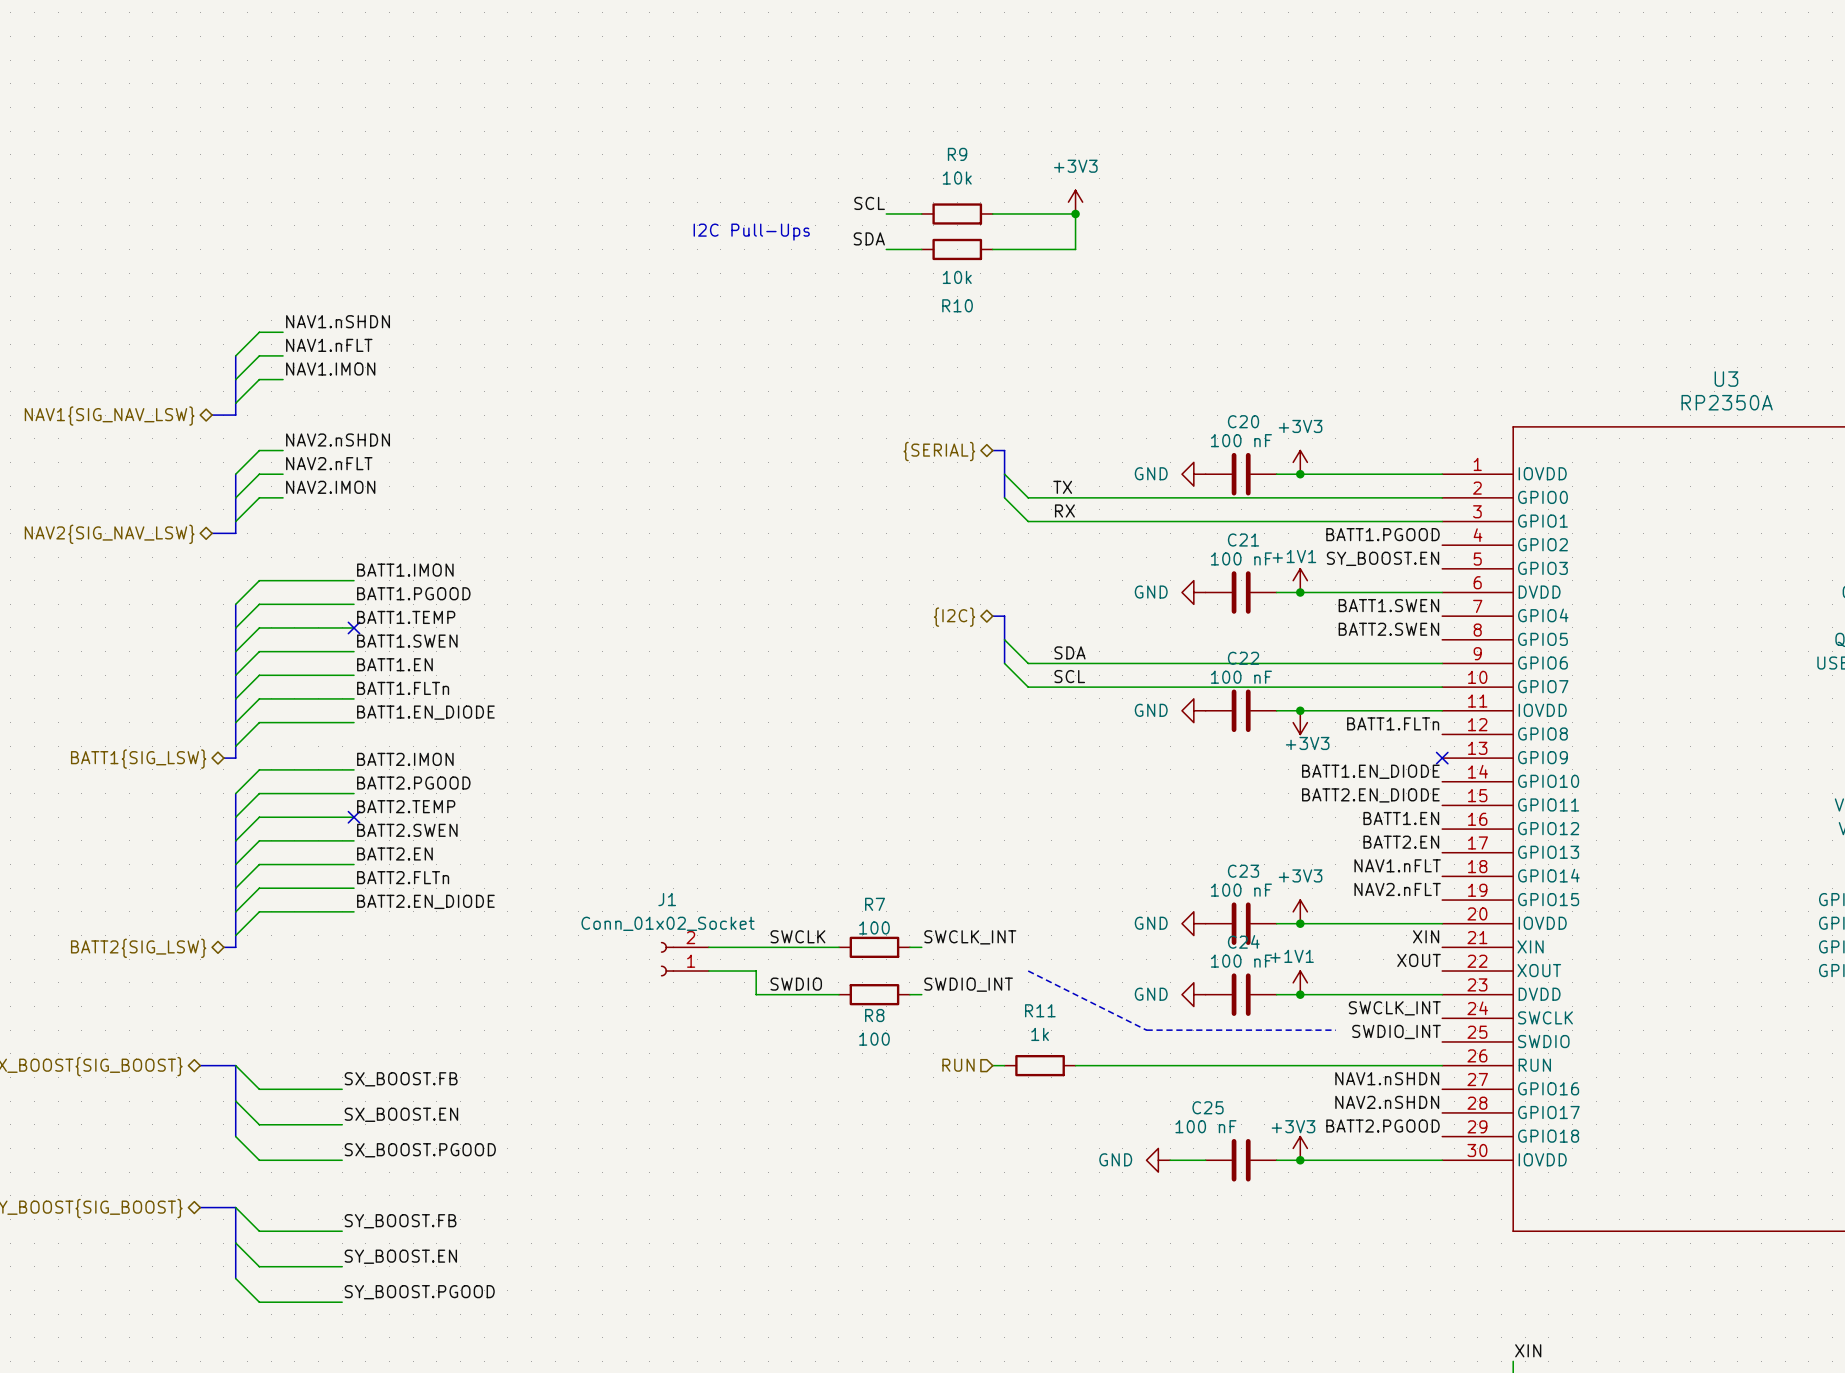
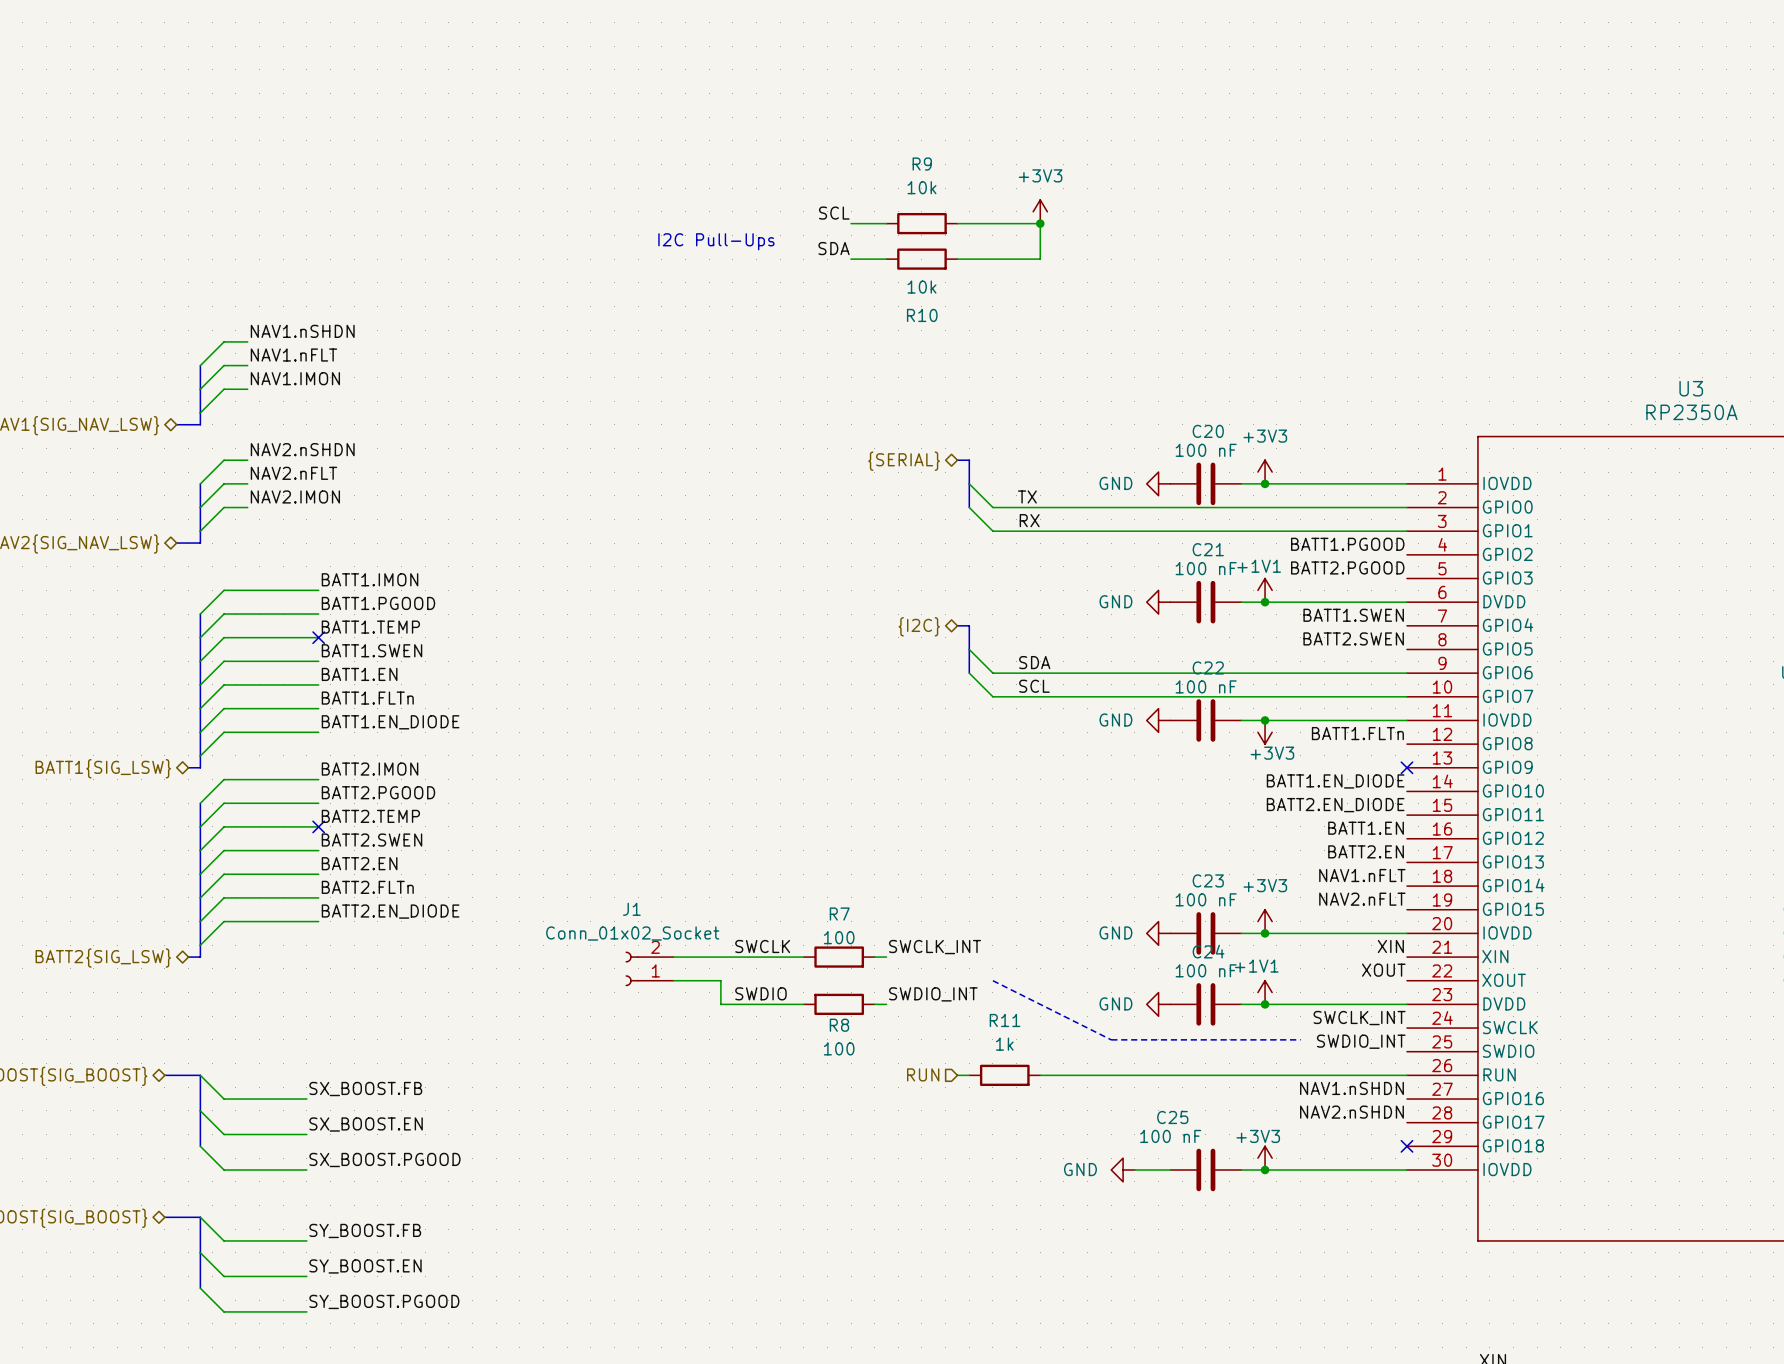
label: SY_BOOST.EN (1383, 558) -> BATT2.PGOOD (1347, 567)
label: BATT2.PGOOD (1383, 1126) -> none
no-connect mark: none -> (1406, 1146)

